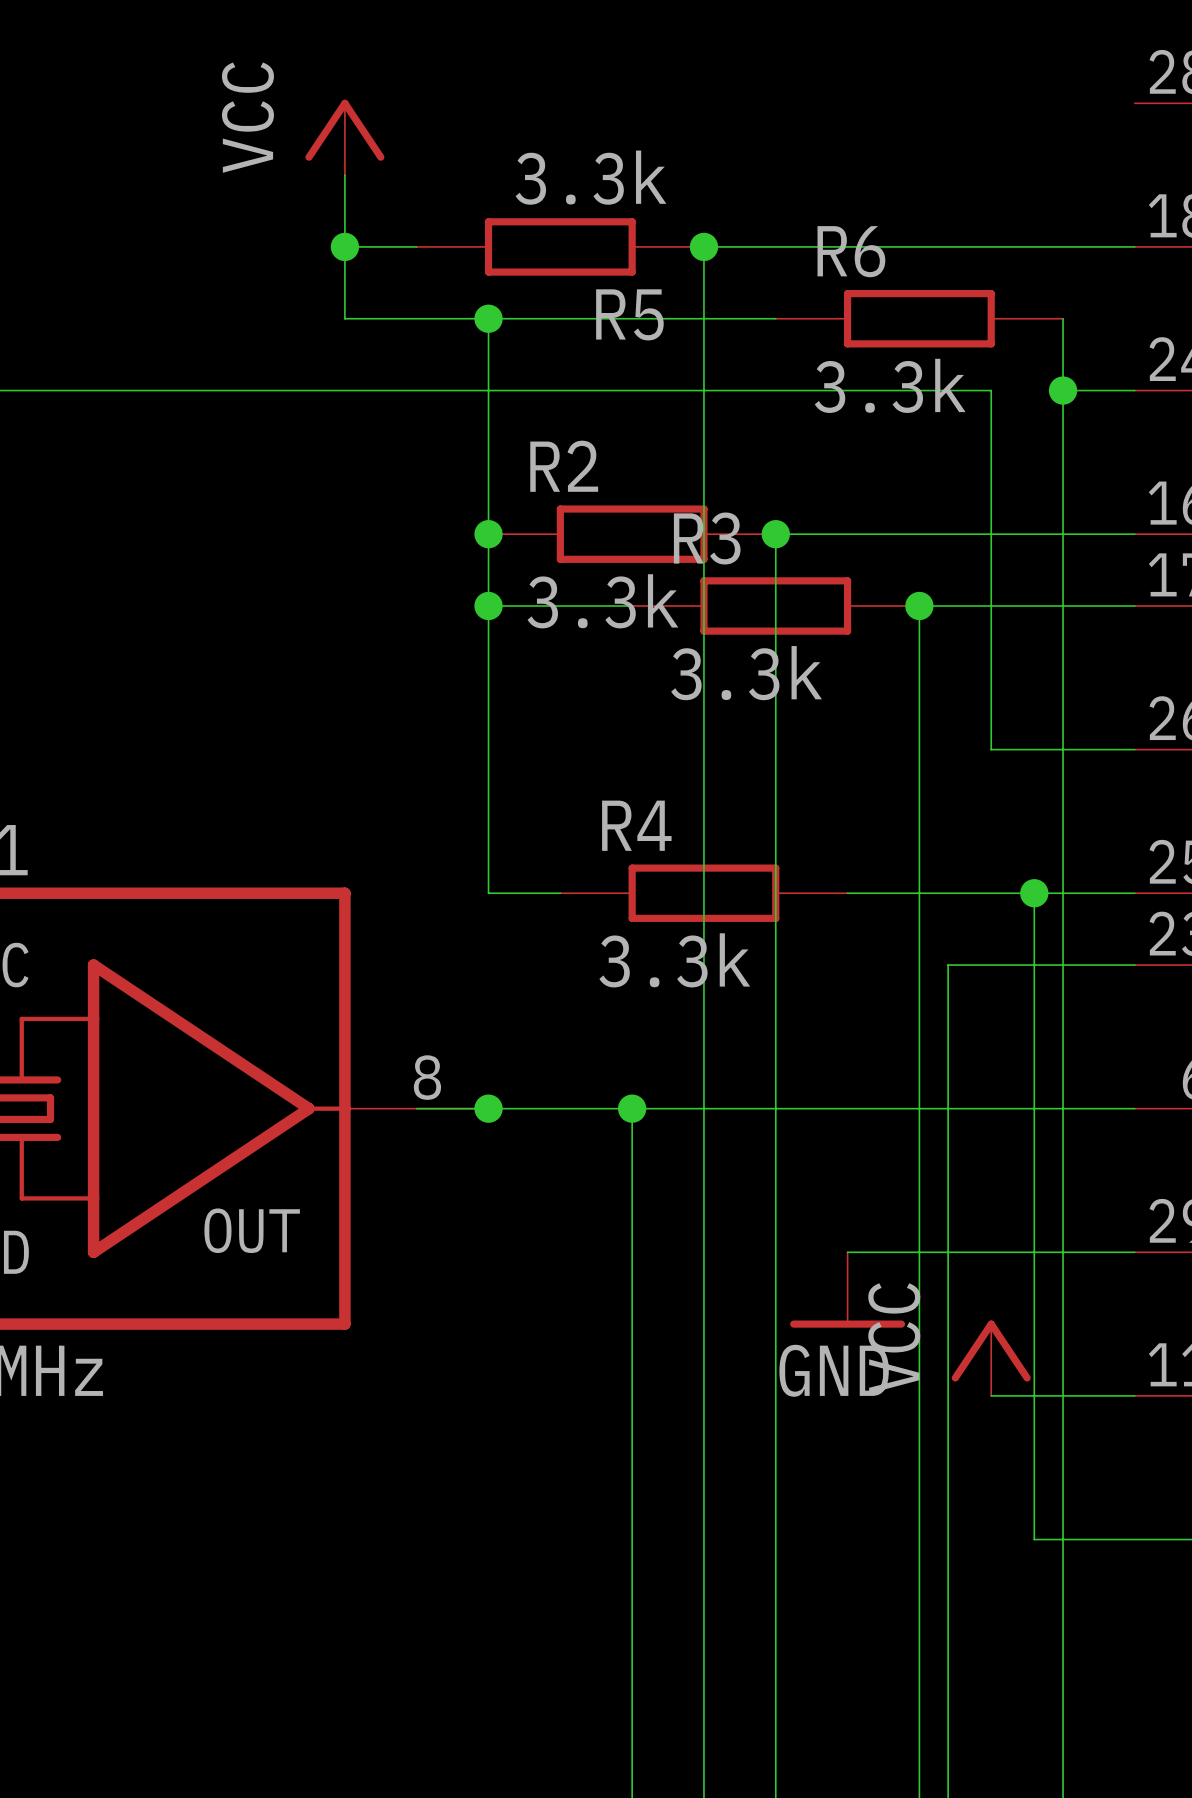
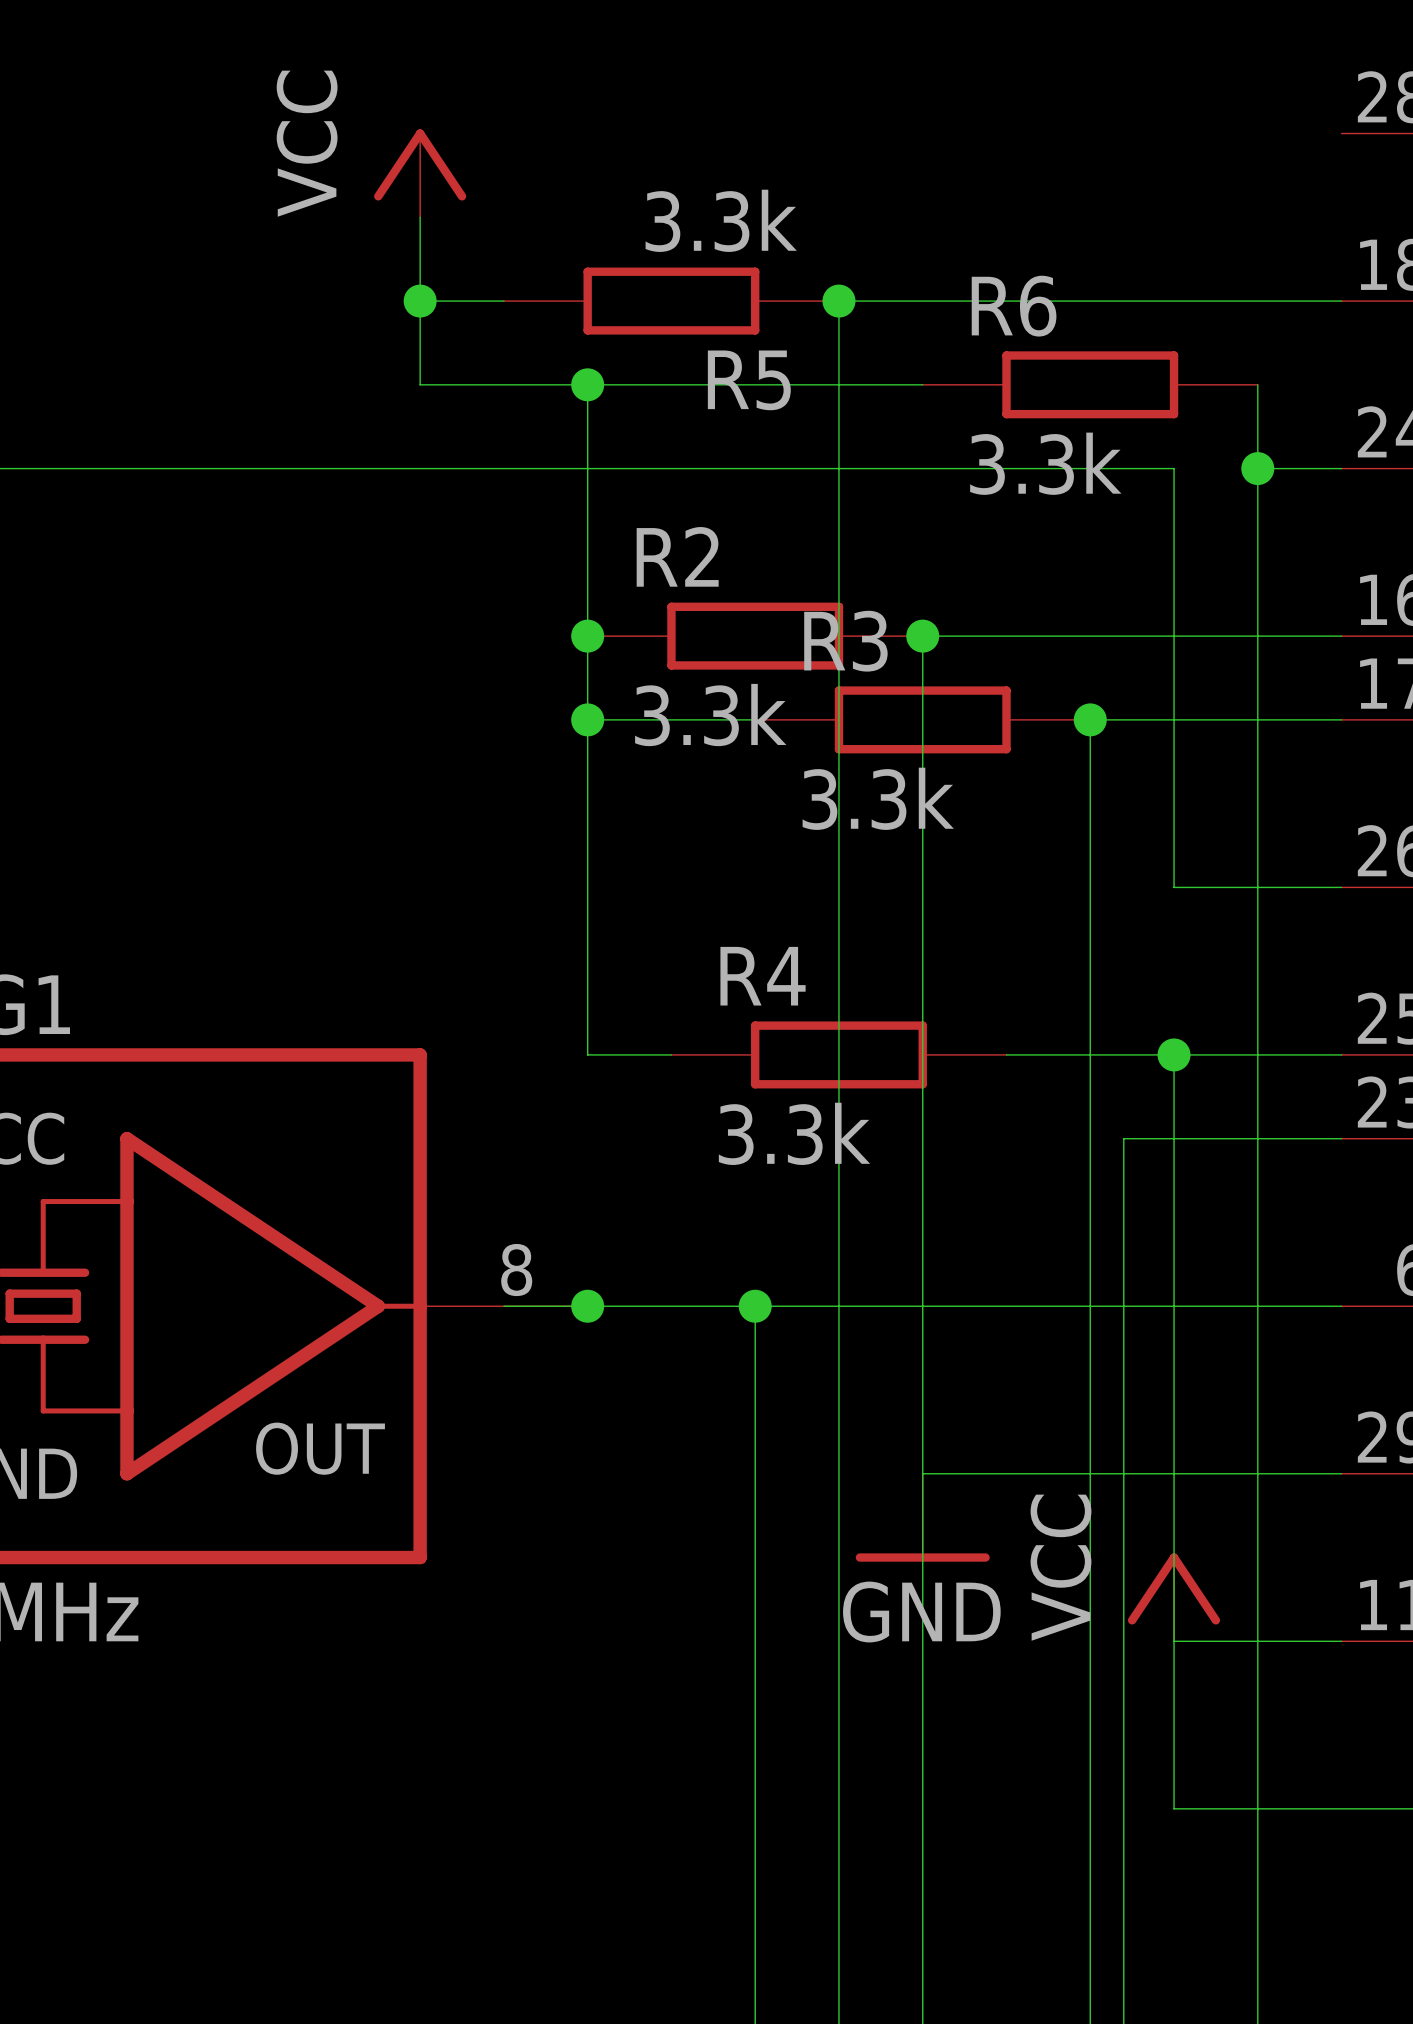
wire: (1034, 893) (1034, 1539) -> (1174, 1054) (1174, 1808) (1224, 1808)
junction position: (1034, 893) -> (1174, 1054)
wire: none -> (922, 1473) (1006, 1473)
power symbol position: GND (847, 1289) -> GND (922, 1517)

